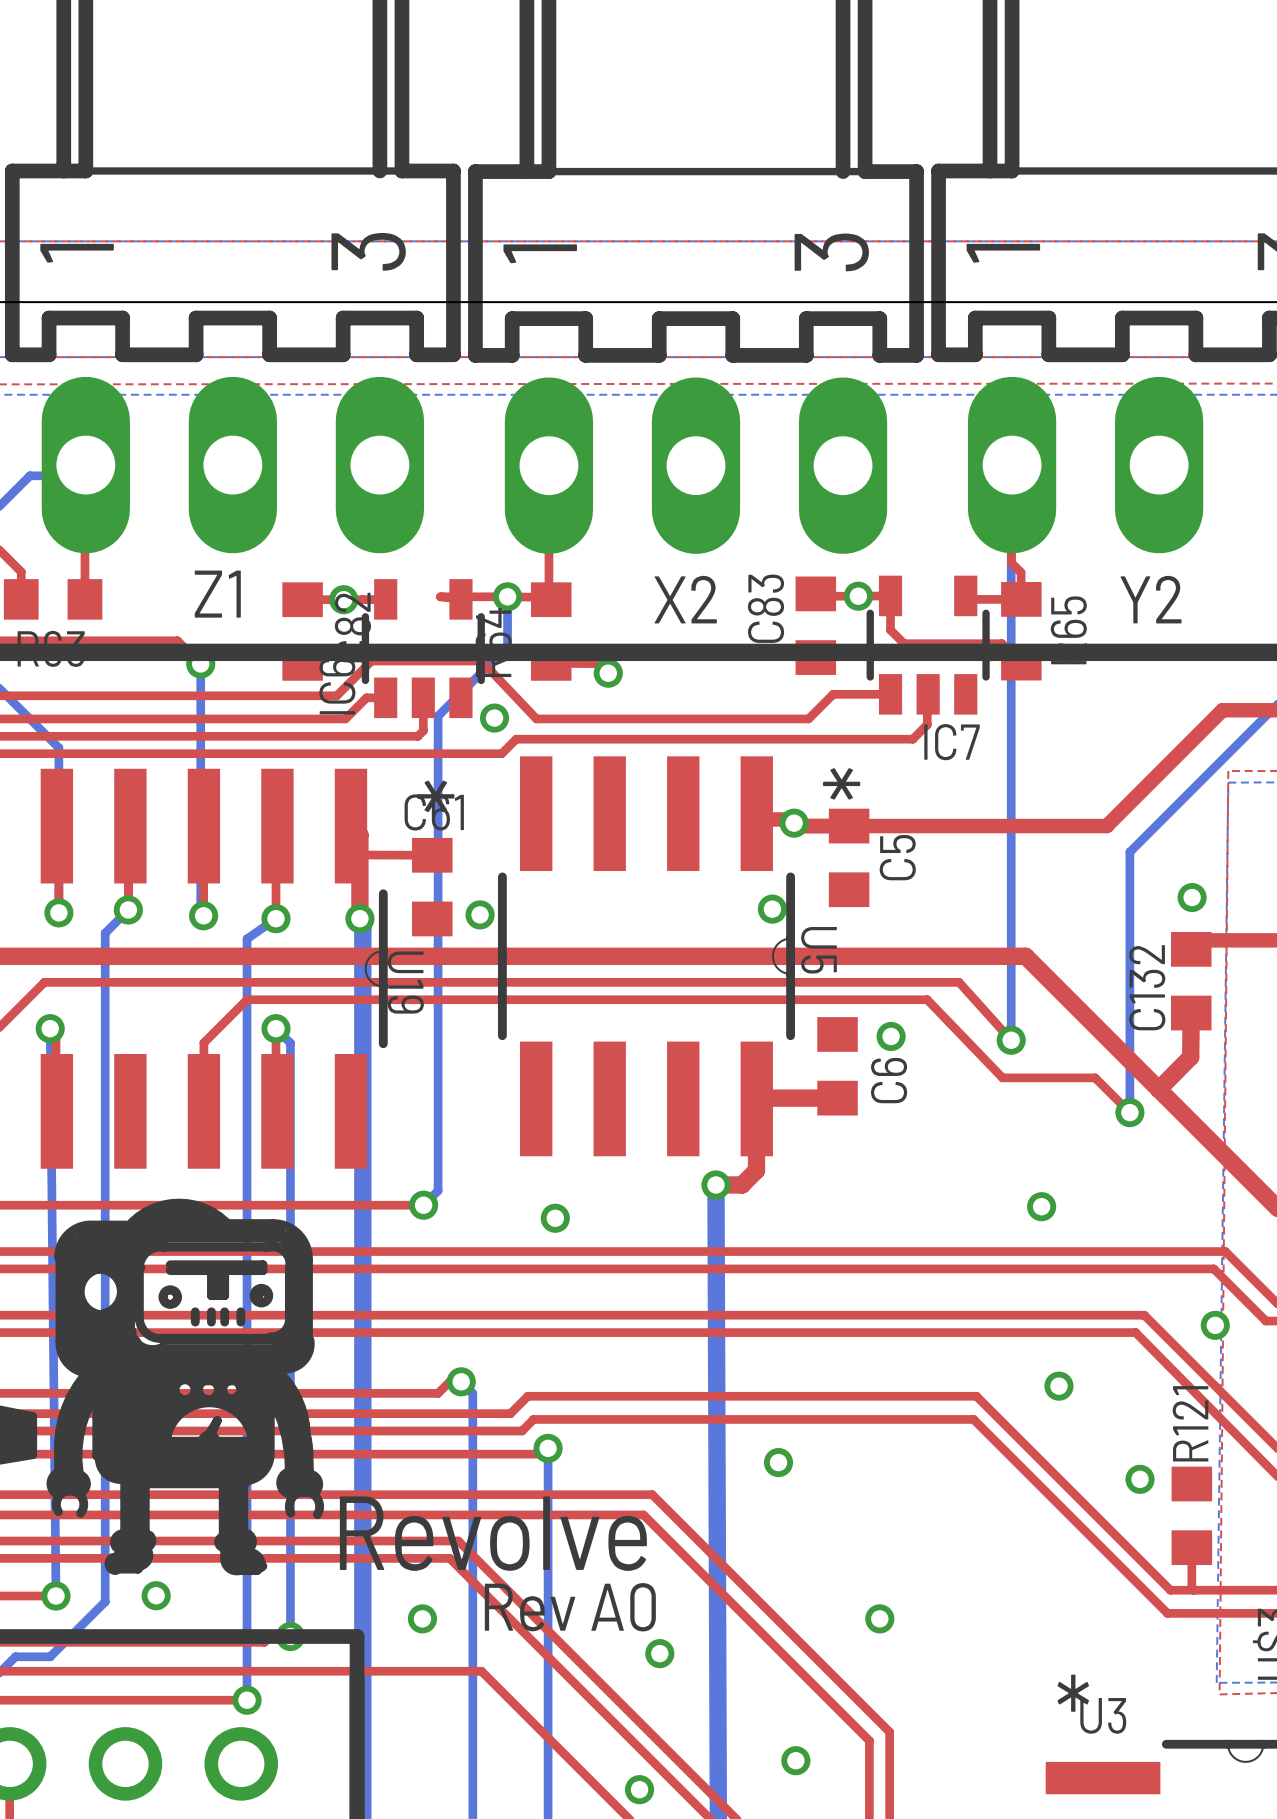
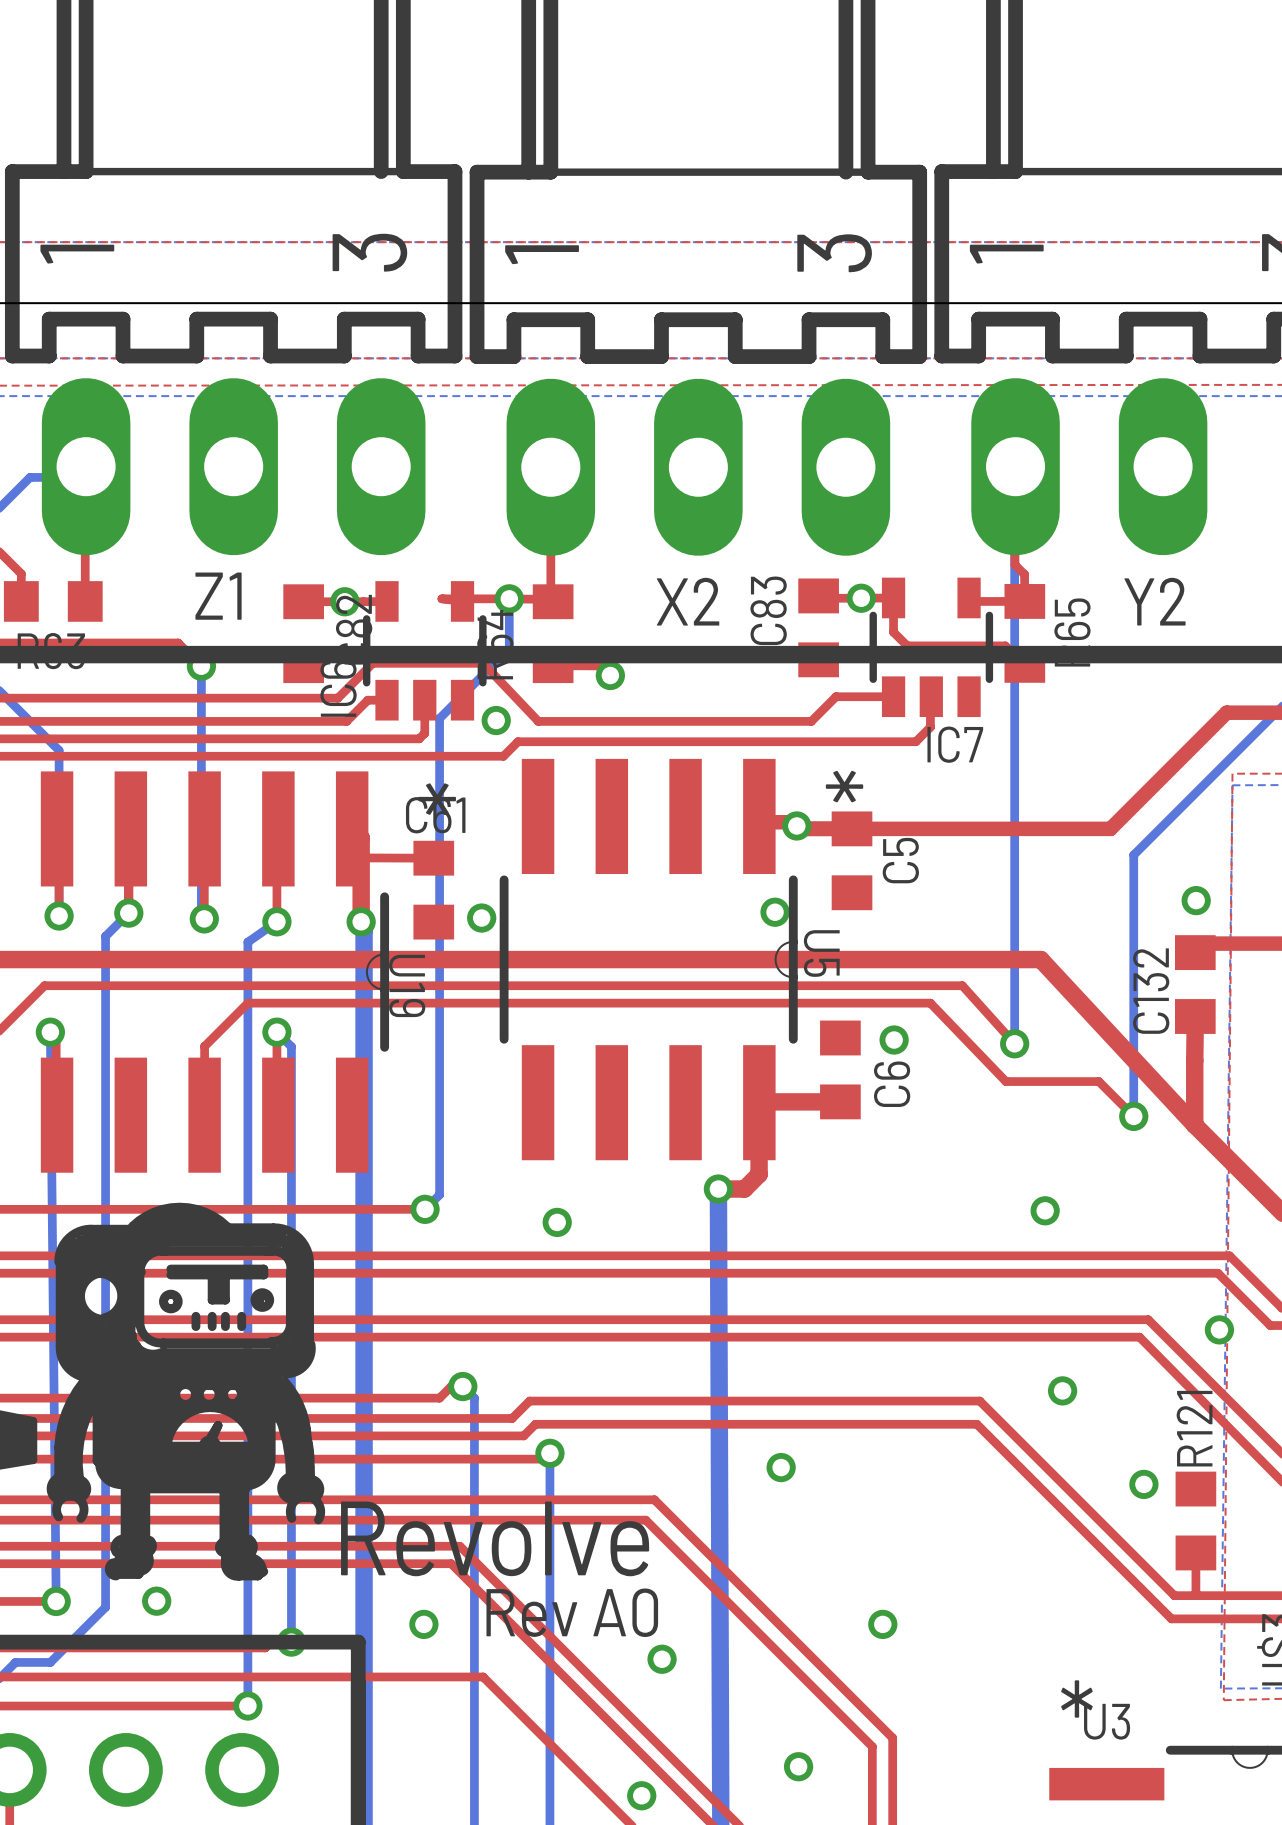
top track: (1025, 956) (1190, 1121) -> (1029, 959) (1040, 959) (1194, 1125) (1194, 1060)
top track: (1190, 1057) (1158, 1089) -> none

